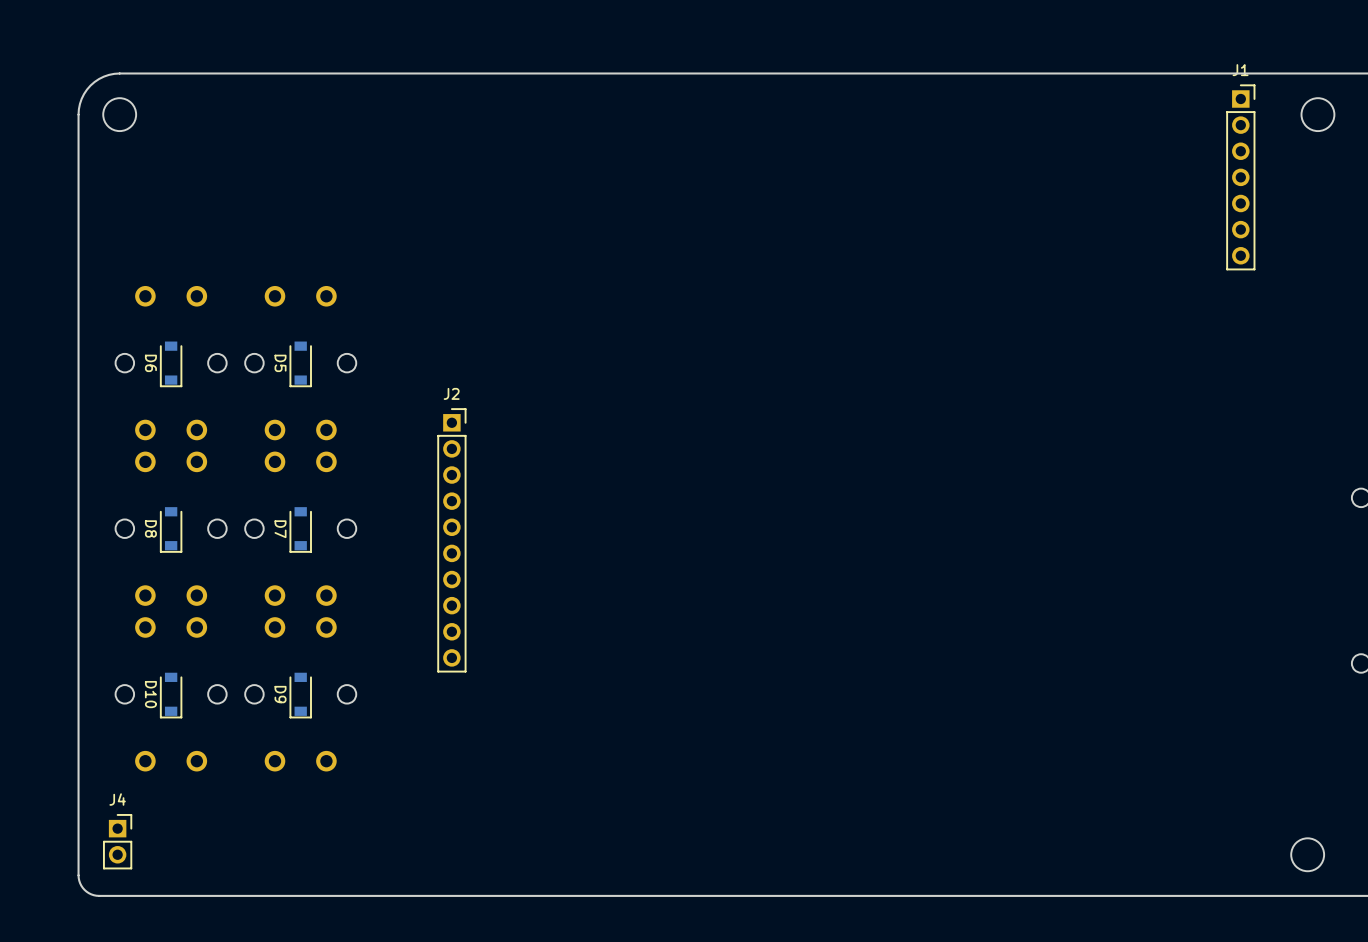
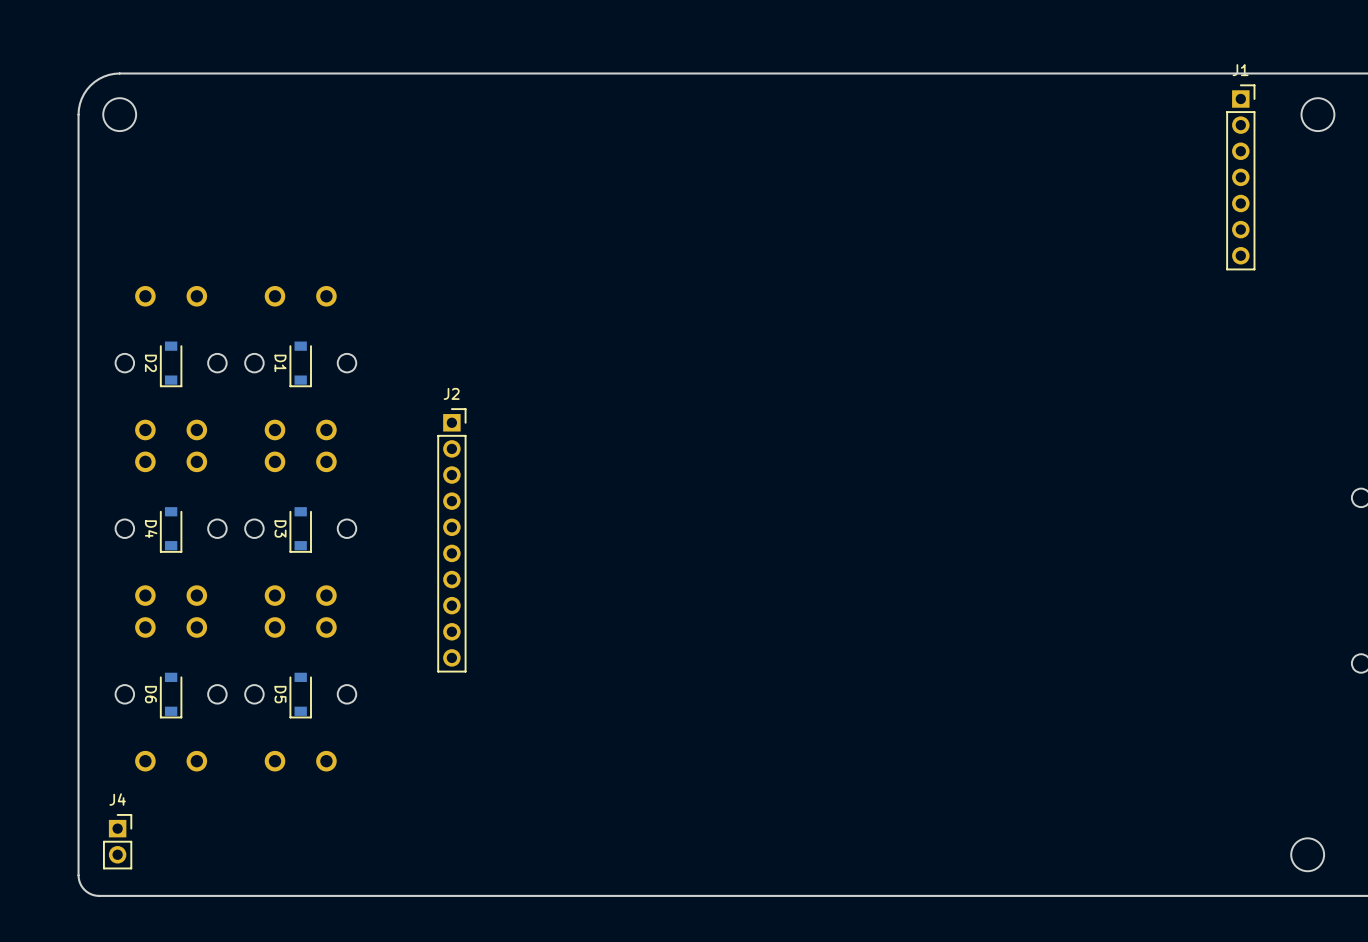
D6 name: D6 (150, 363) -> D2 (150, 363)
D5 name: D5 (280, 363) -> D1 (280, 363)
D8 name: D8 (150, 528) -> D4 (151, 529)
D7 name: D7 (280, 529) -> D3 (280, 528)
D10 name: D10 (150, 694) -> D6 (150, 694)
D9 name: D9 (280, 694) -> D5 (280, 694)

